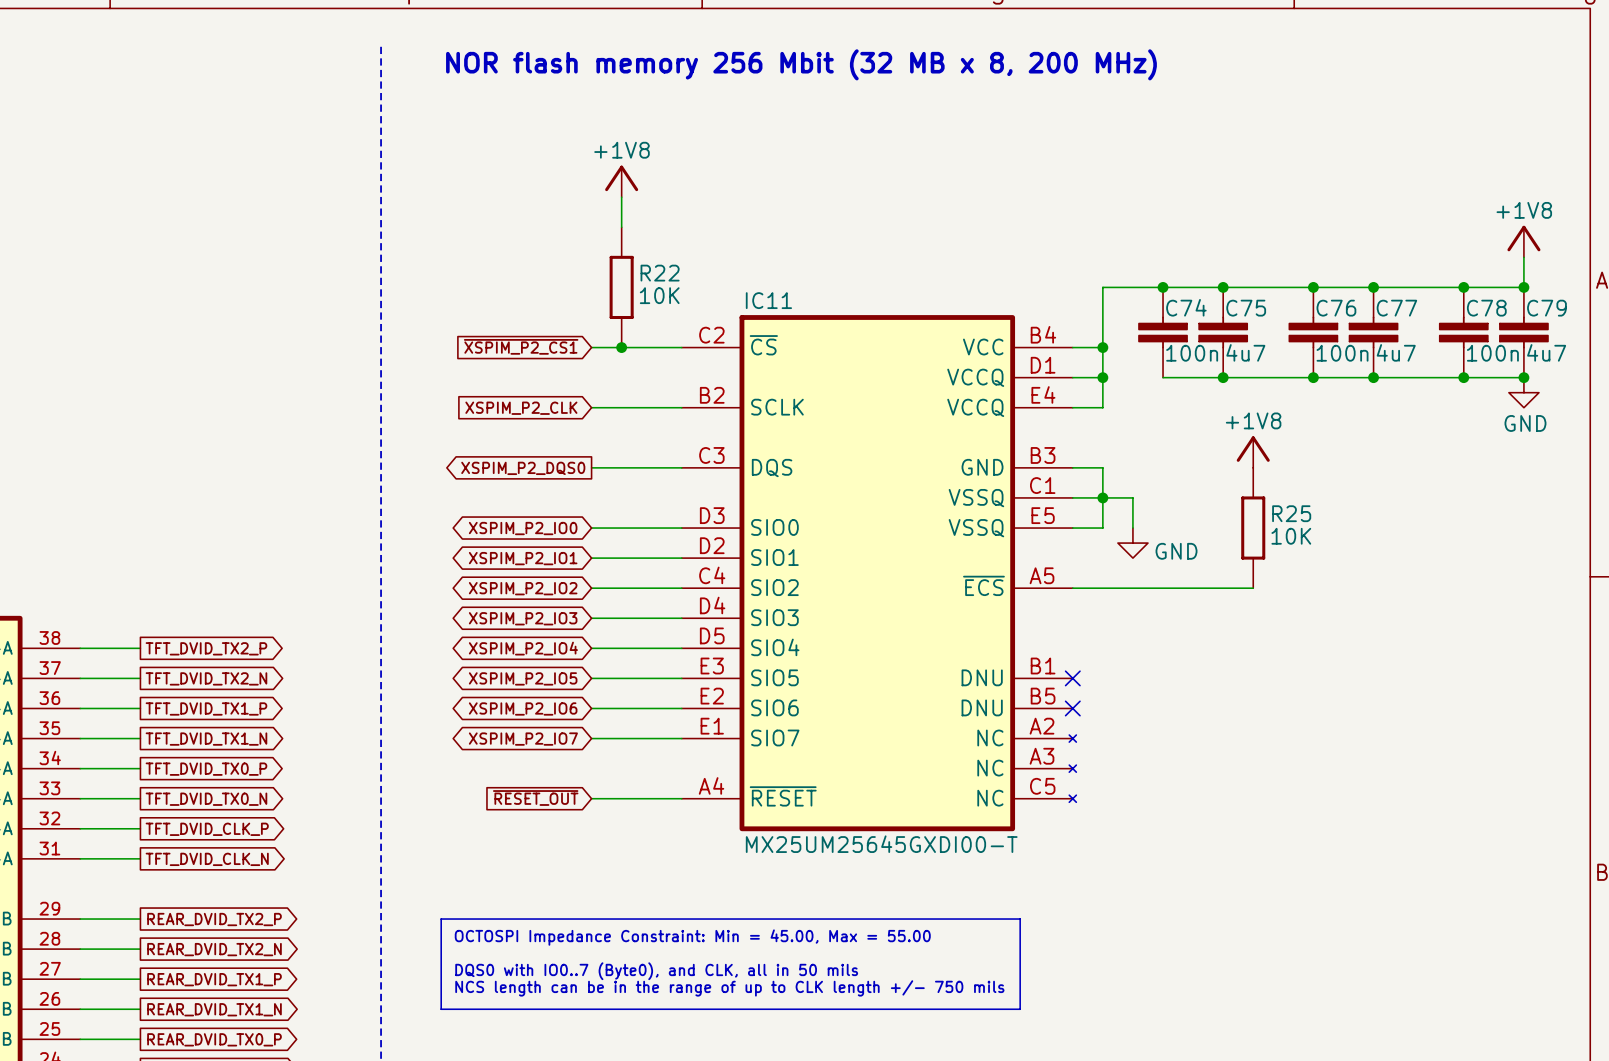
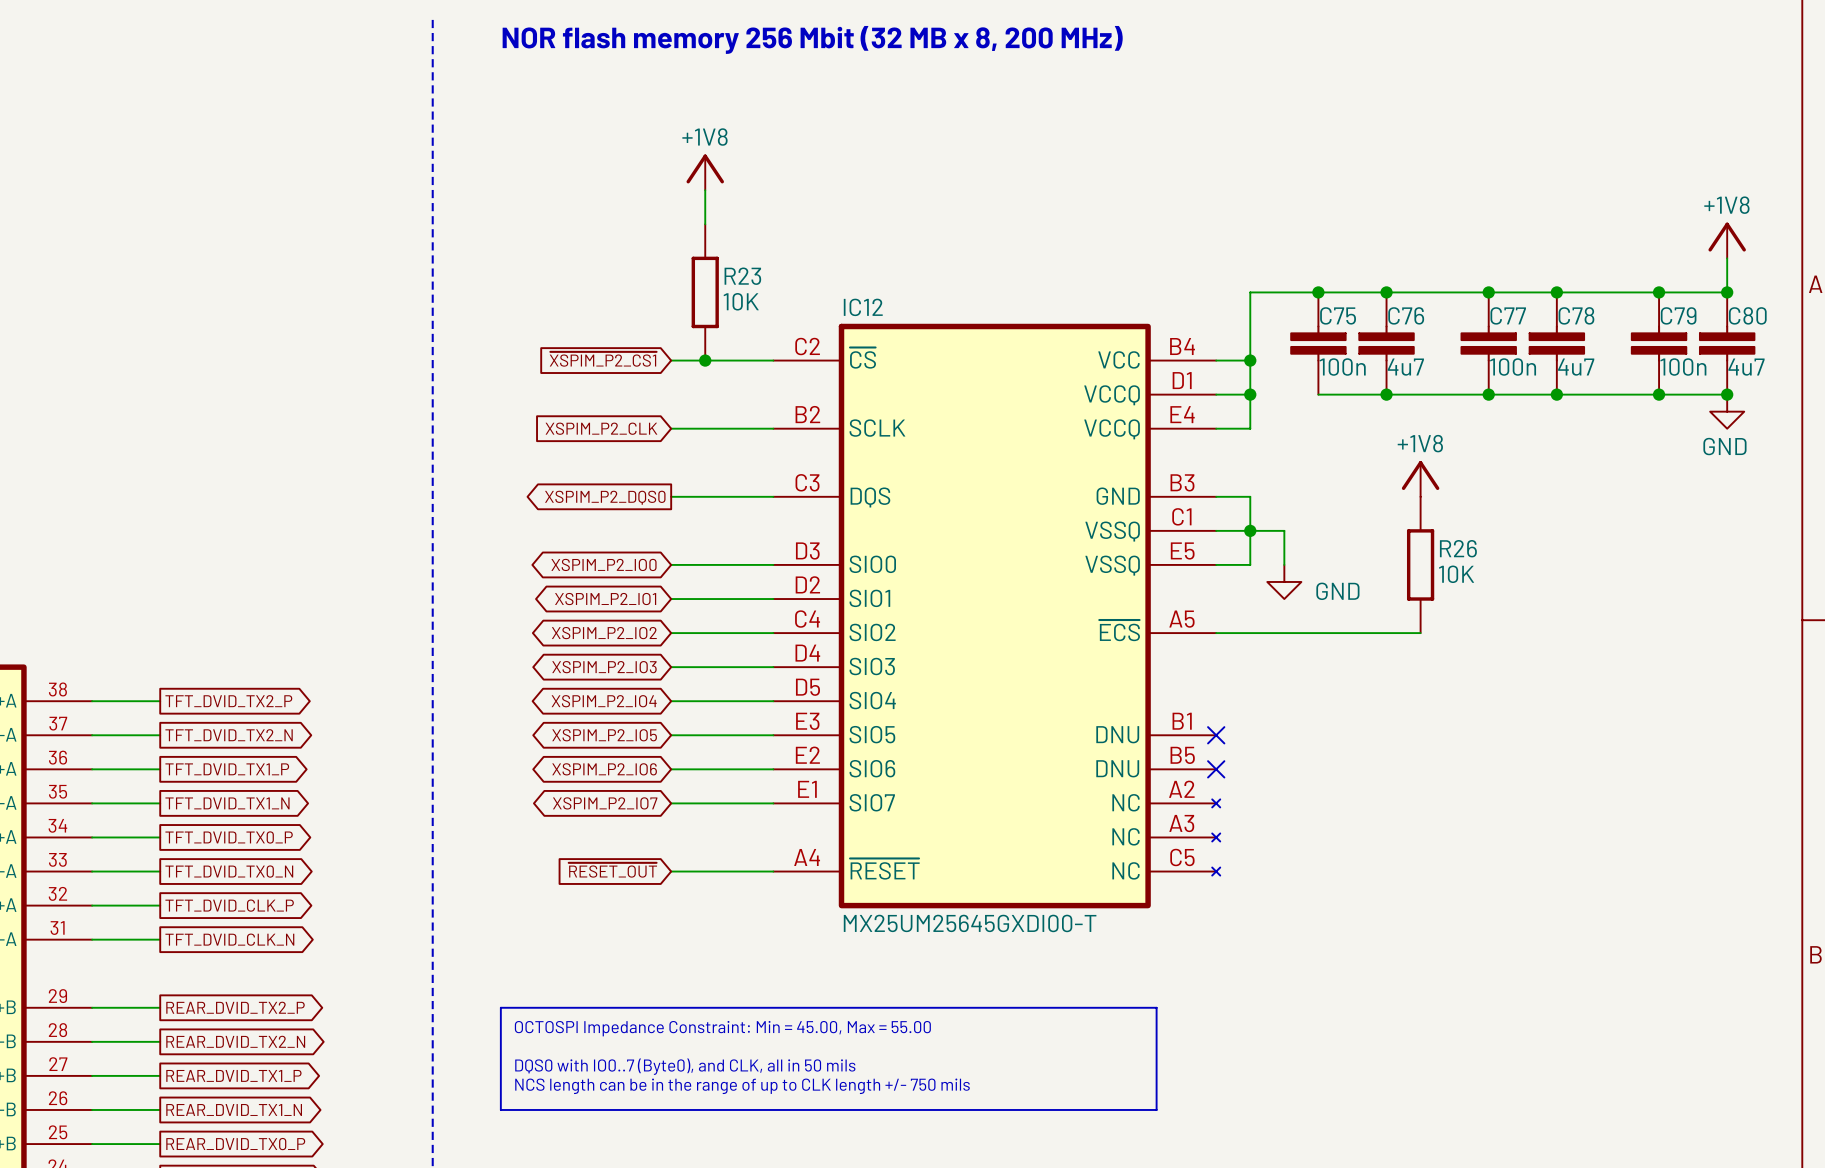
R22 name: R22 (660, 273) -> R23 (742, 276)
IC11 name: IC11 (768, 300) -> IC12 (863, 307)
C74 name: C74 (1186, 307) -> C75 (1338, 315)
C75 name: C75 (1246, 308) -> C76 (1406, 315)
C76 name: C76 (1336, 308) -> C77 (1508, 315)
C77 name: C77 (1396, 308) -> C78 (1576, 315)
C78 name: C78 (1486, 308) -> C79 (1678, 315)
C79 name: C79 (1546, 308) -> C80 (1747, 315)
R25 name: R25 (1291, 513) -> R26 (1458, 548)

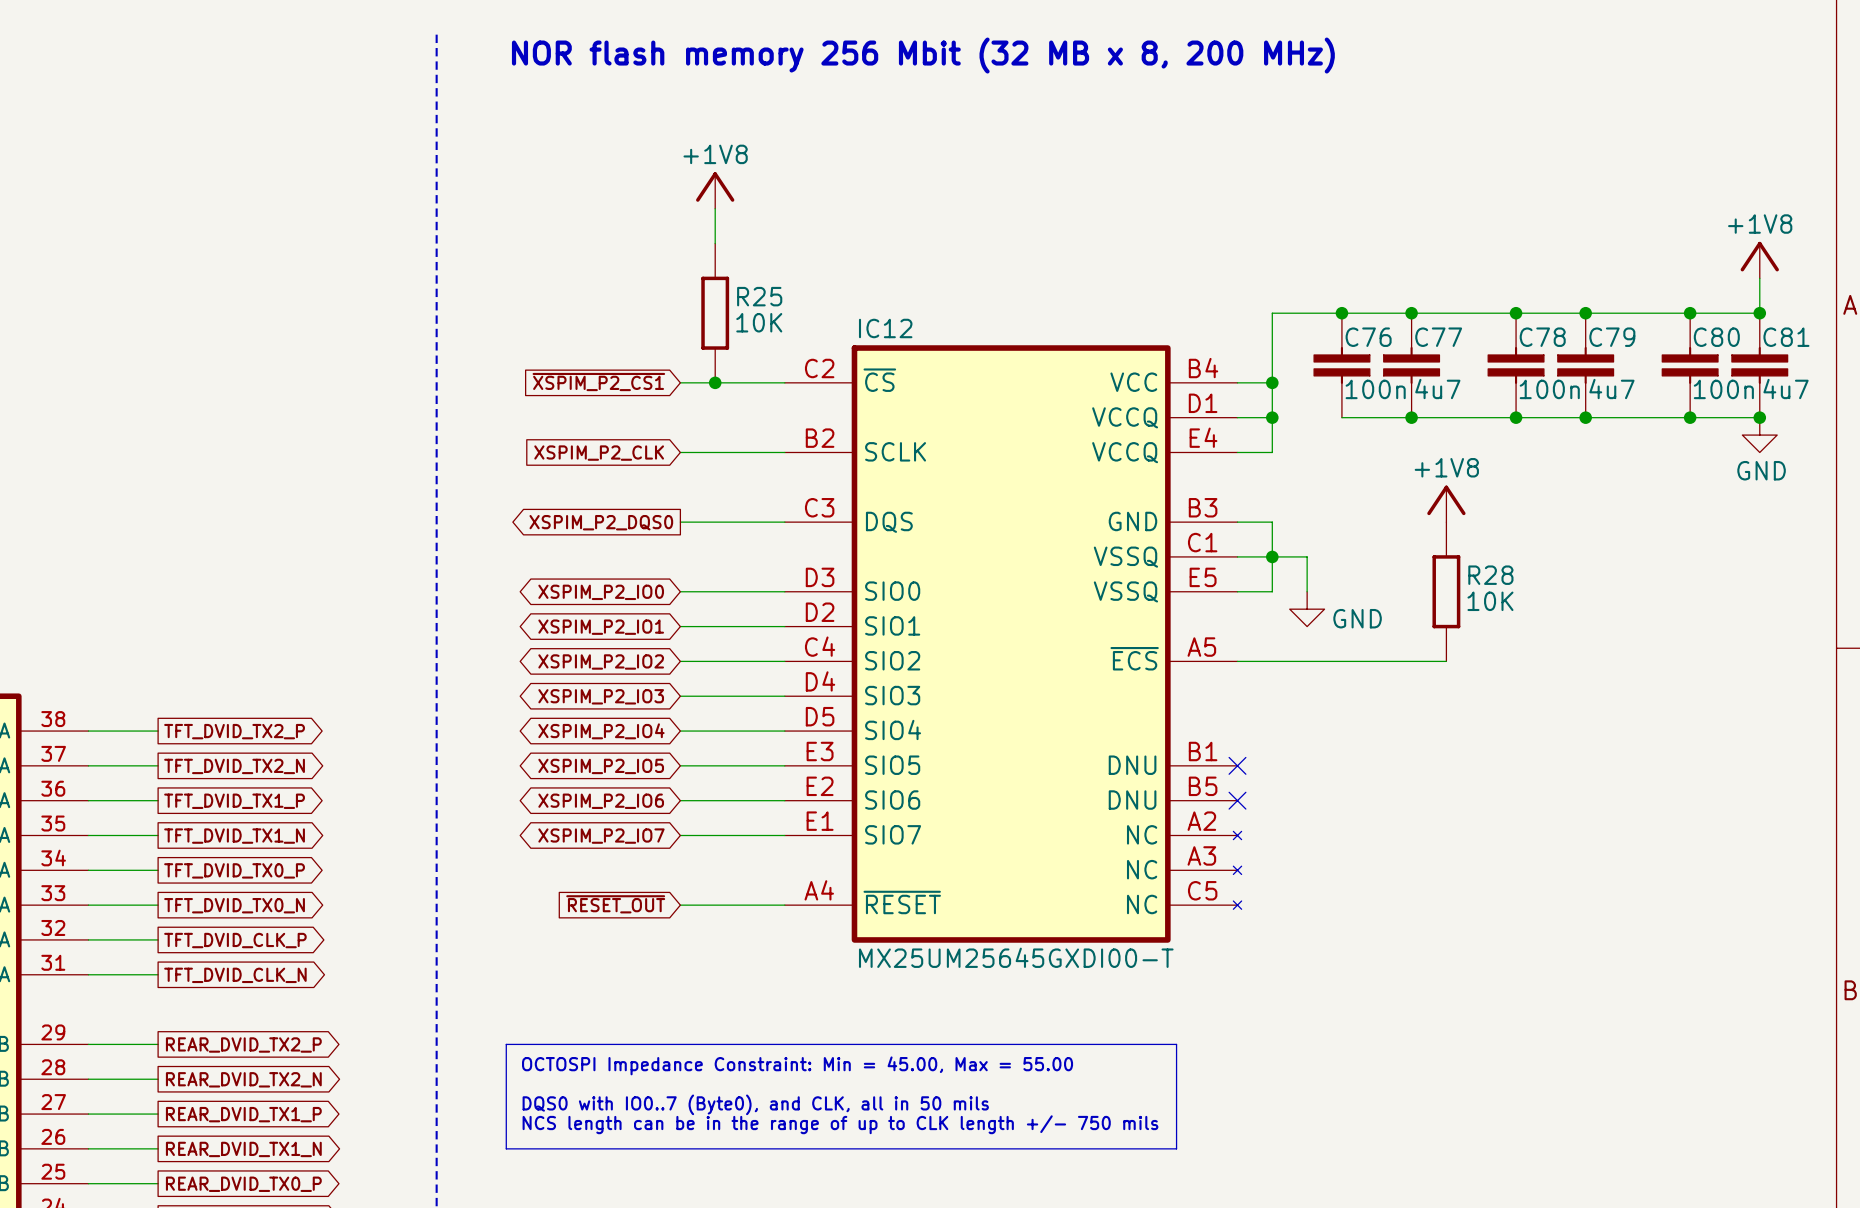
R23 name: R23 (742, 276) -> R25 (759, 296)
C75 name: C75 (1338, 315) -> C76 (1368, 337)
C76 name: C76 (1406, 315) -> C77 (1438, 337)
C77 name: C77 (1508, 315) -> C78 (1542, 337)
C78 name: C78 (1576, 315) -> C79 (1612, 337)
C79 name: C79 (1678, 315) -> C80 (1716, 337)
C80 name: C80 (1747, 315) -> C81 (1786, 337)
R26 name: R26 (1458, 548) -> R28 (1490, 575)

